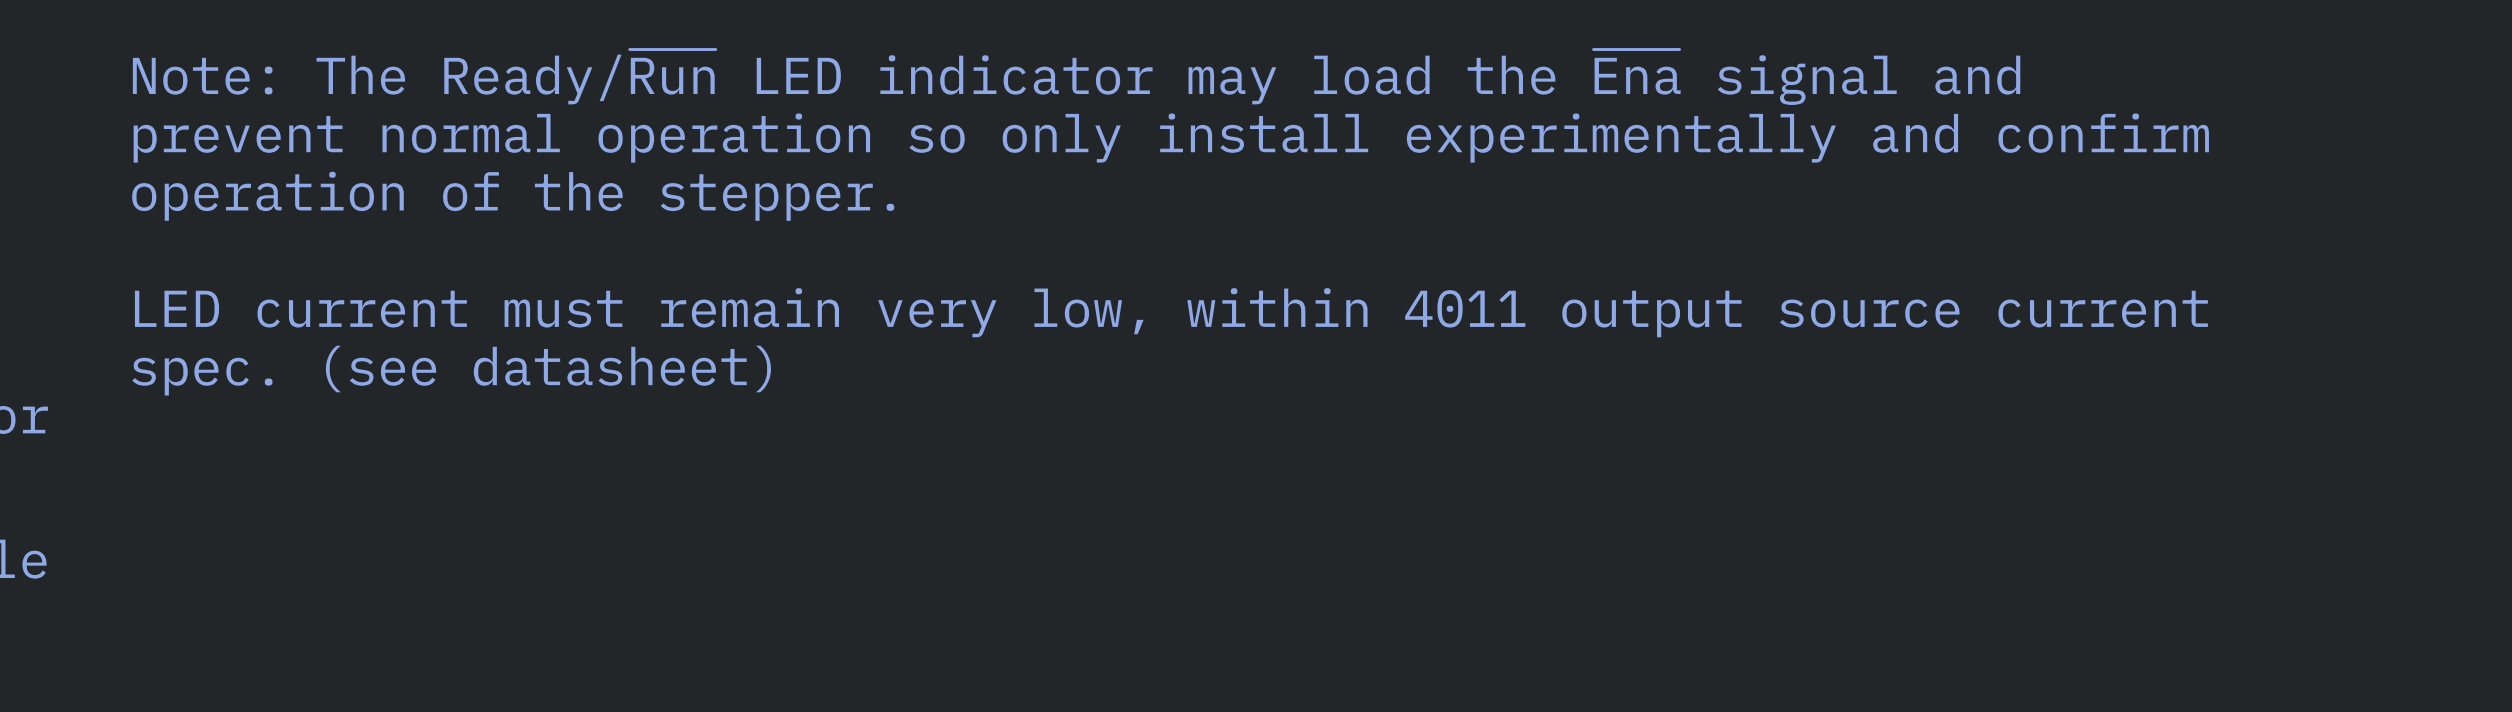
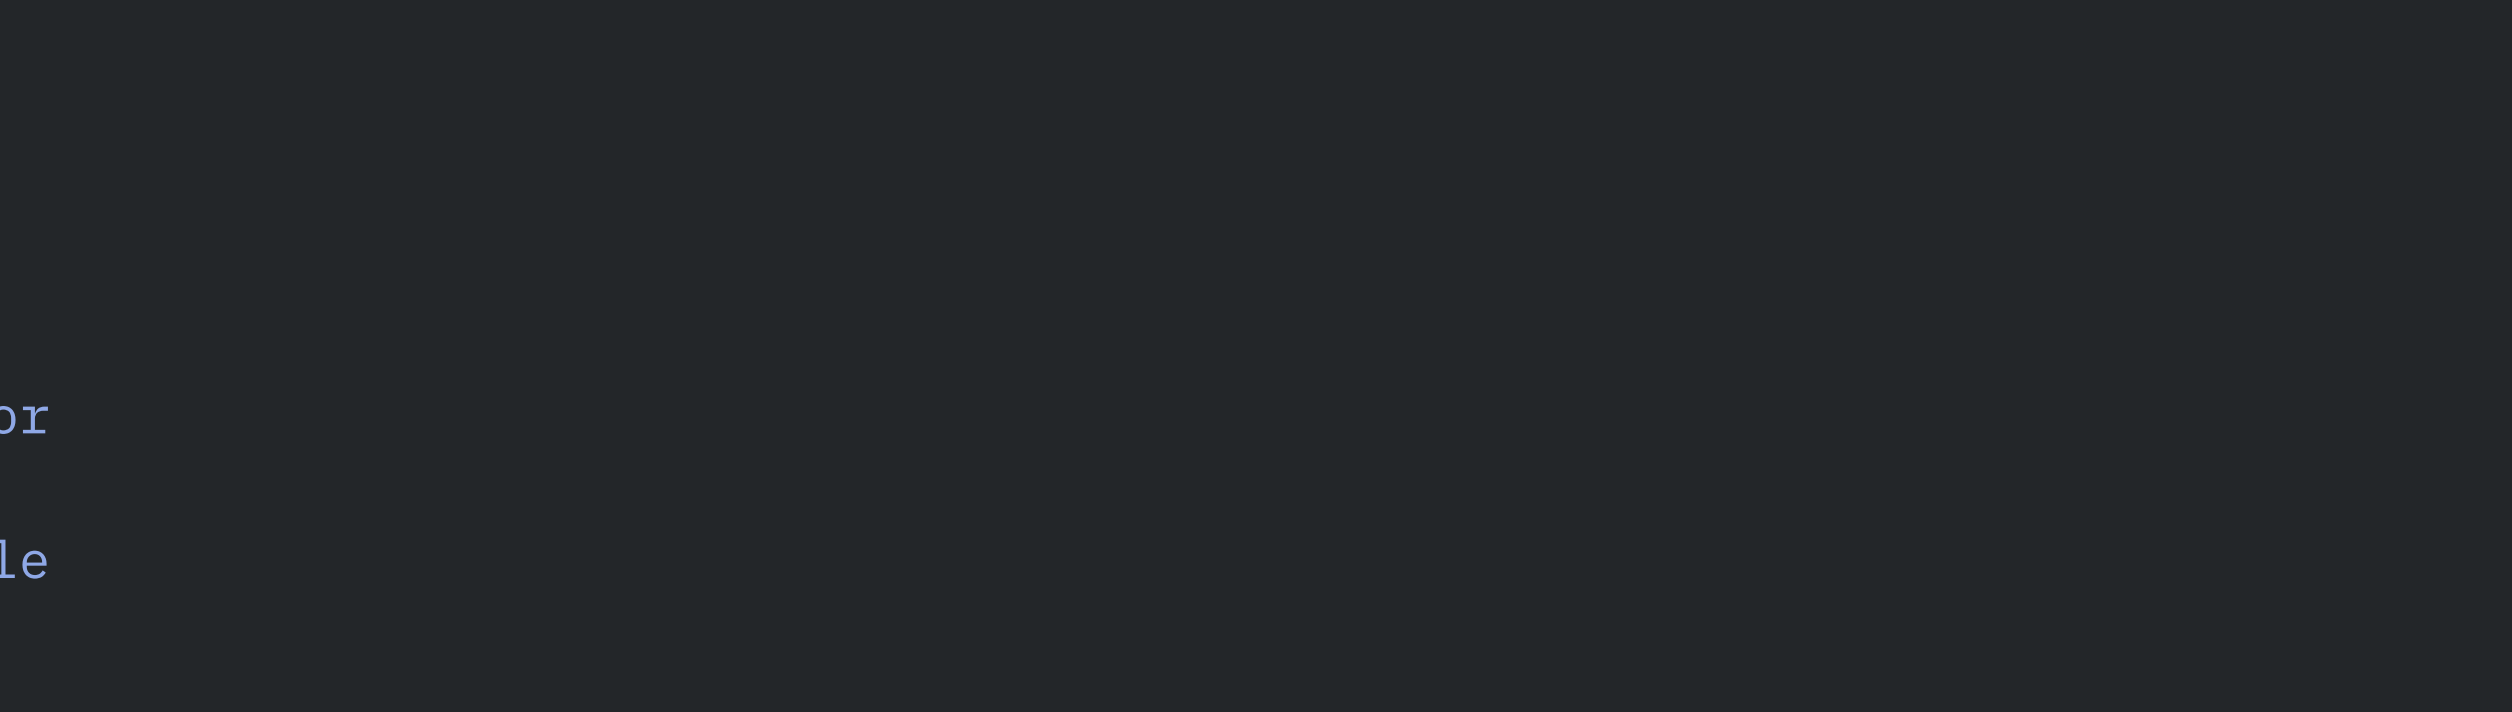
text: Note: The Ready/~{Run} LED indicator may load the ~{Ena} signal and (1076, 77) -> none
text: prevent normal operation so only install experimentally and confirm (1171, 138) -> none
text: operation of the stepper. (513, 196) -> none
text: LED current must remain very low, within 4011 output source current (1171, 312) -> none
text: spec. (see datasheet) (451, 370) -> none

